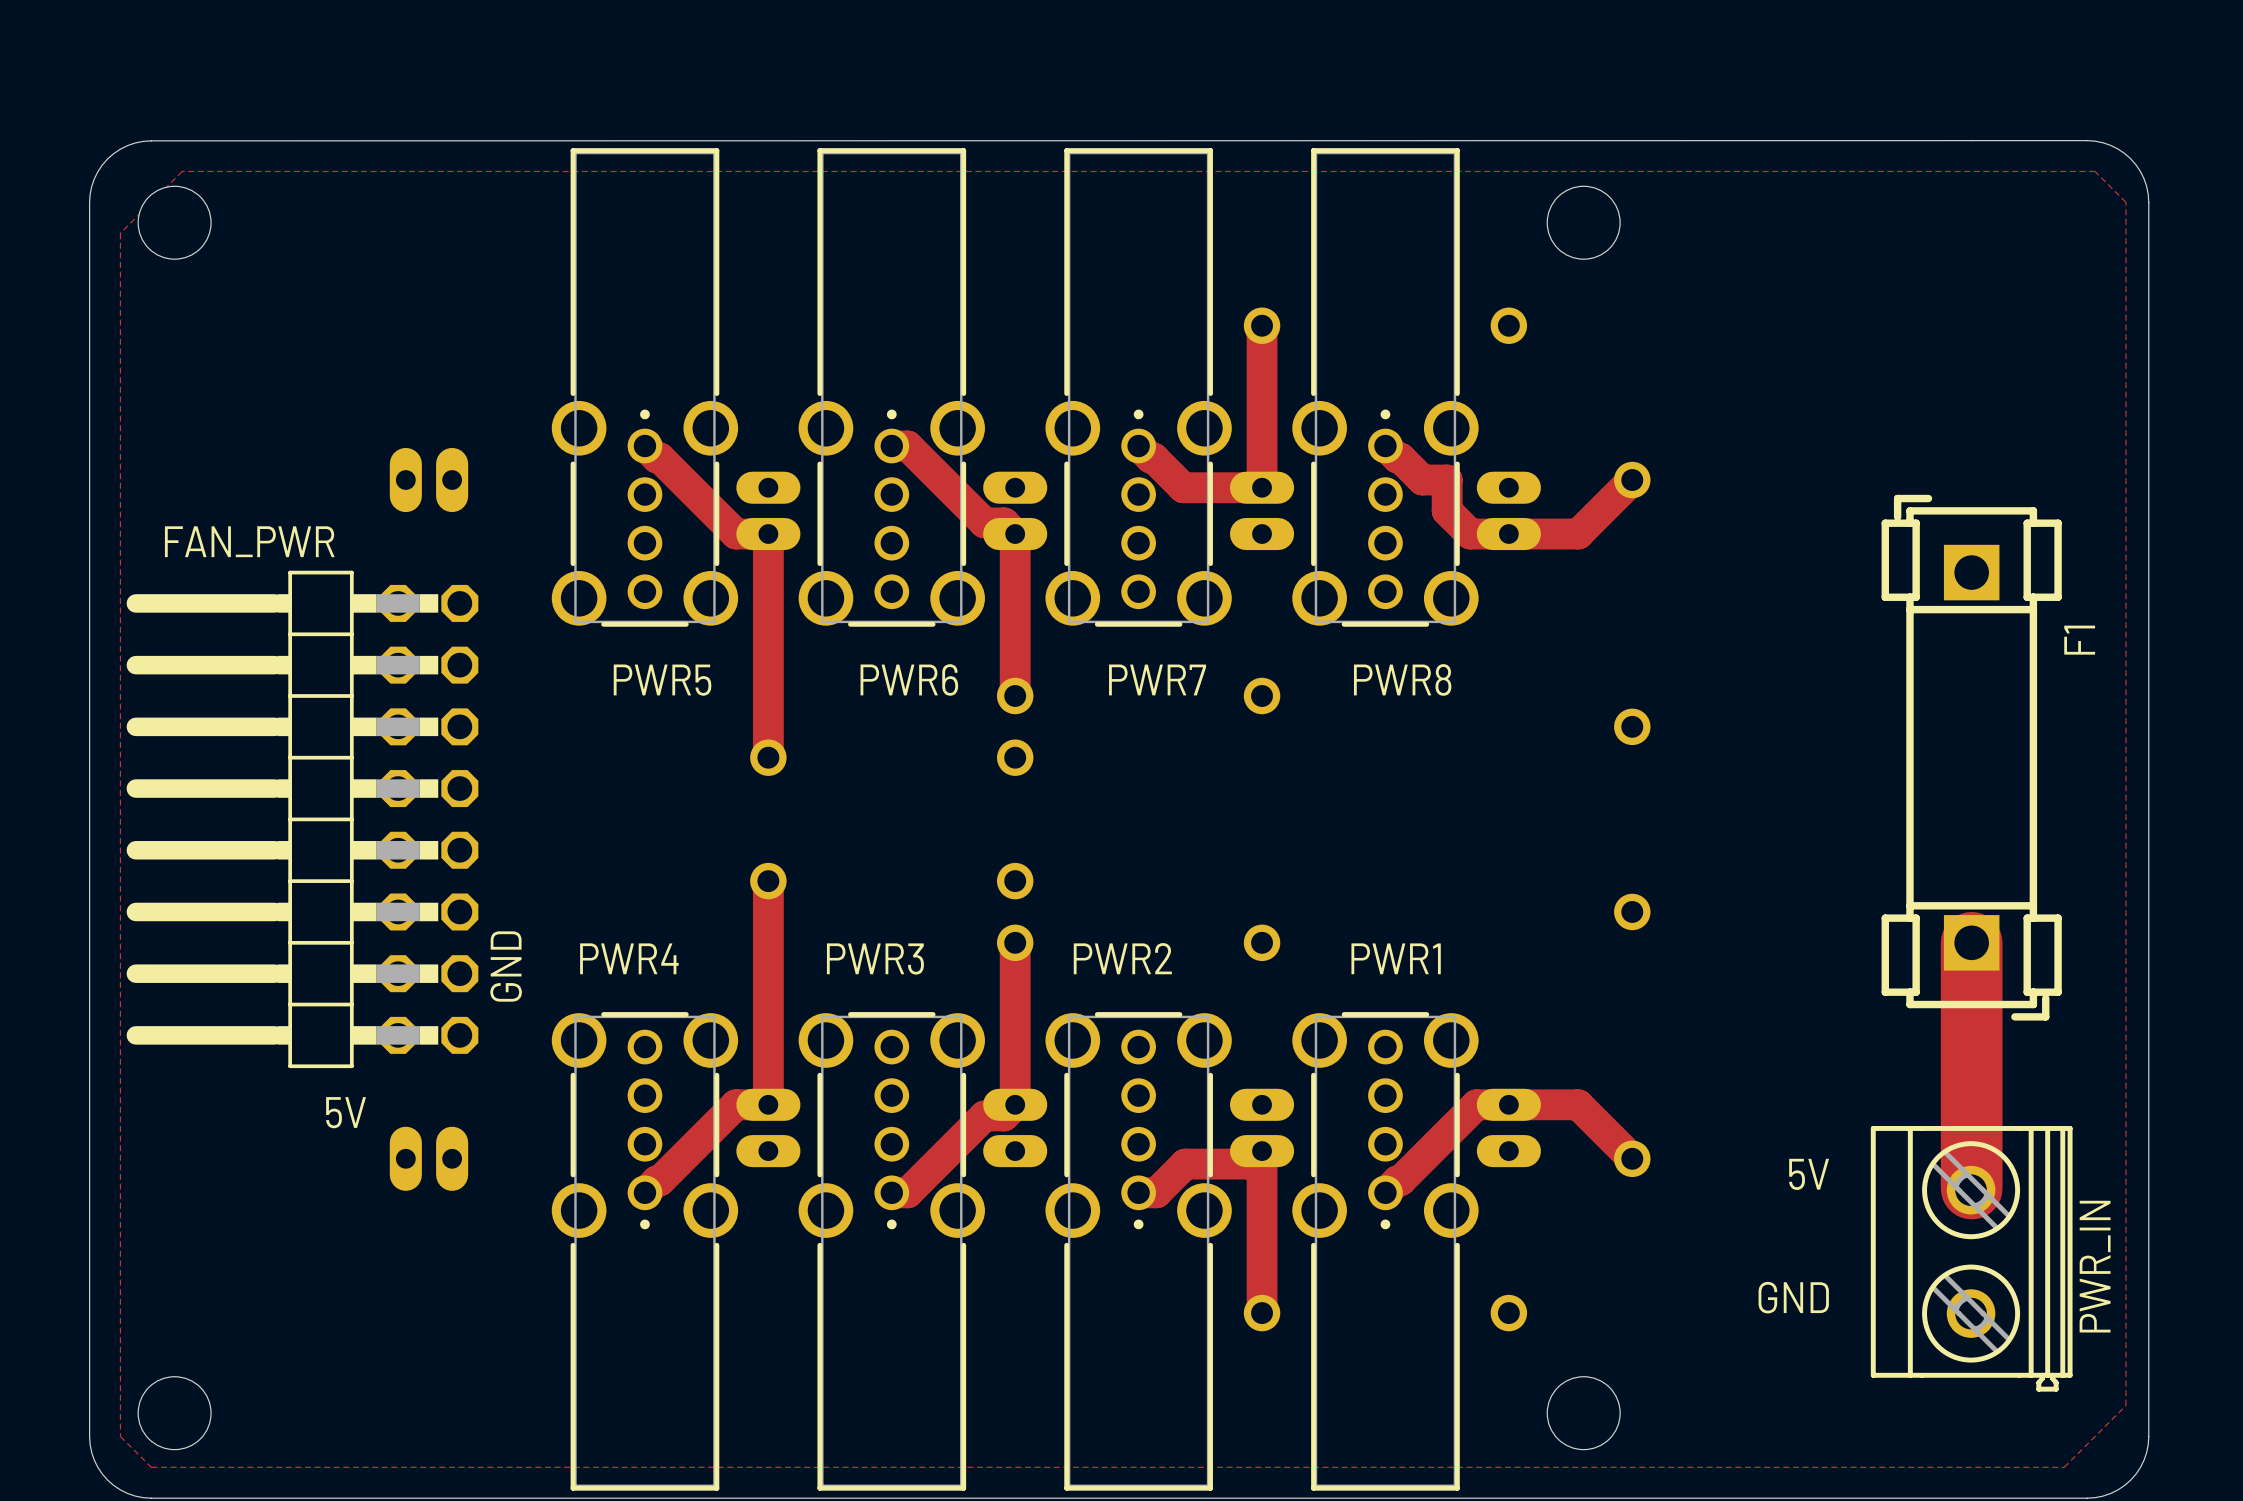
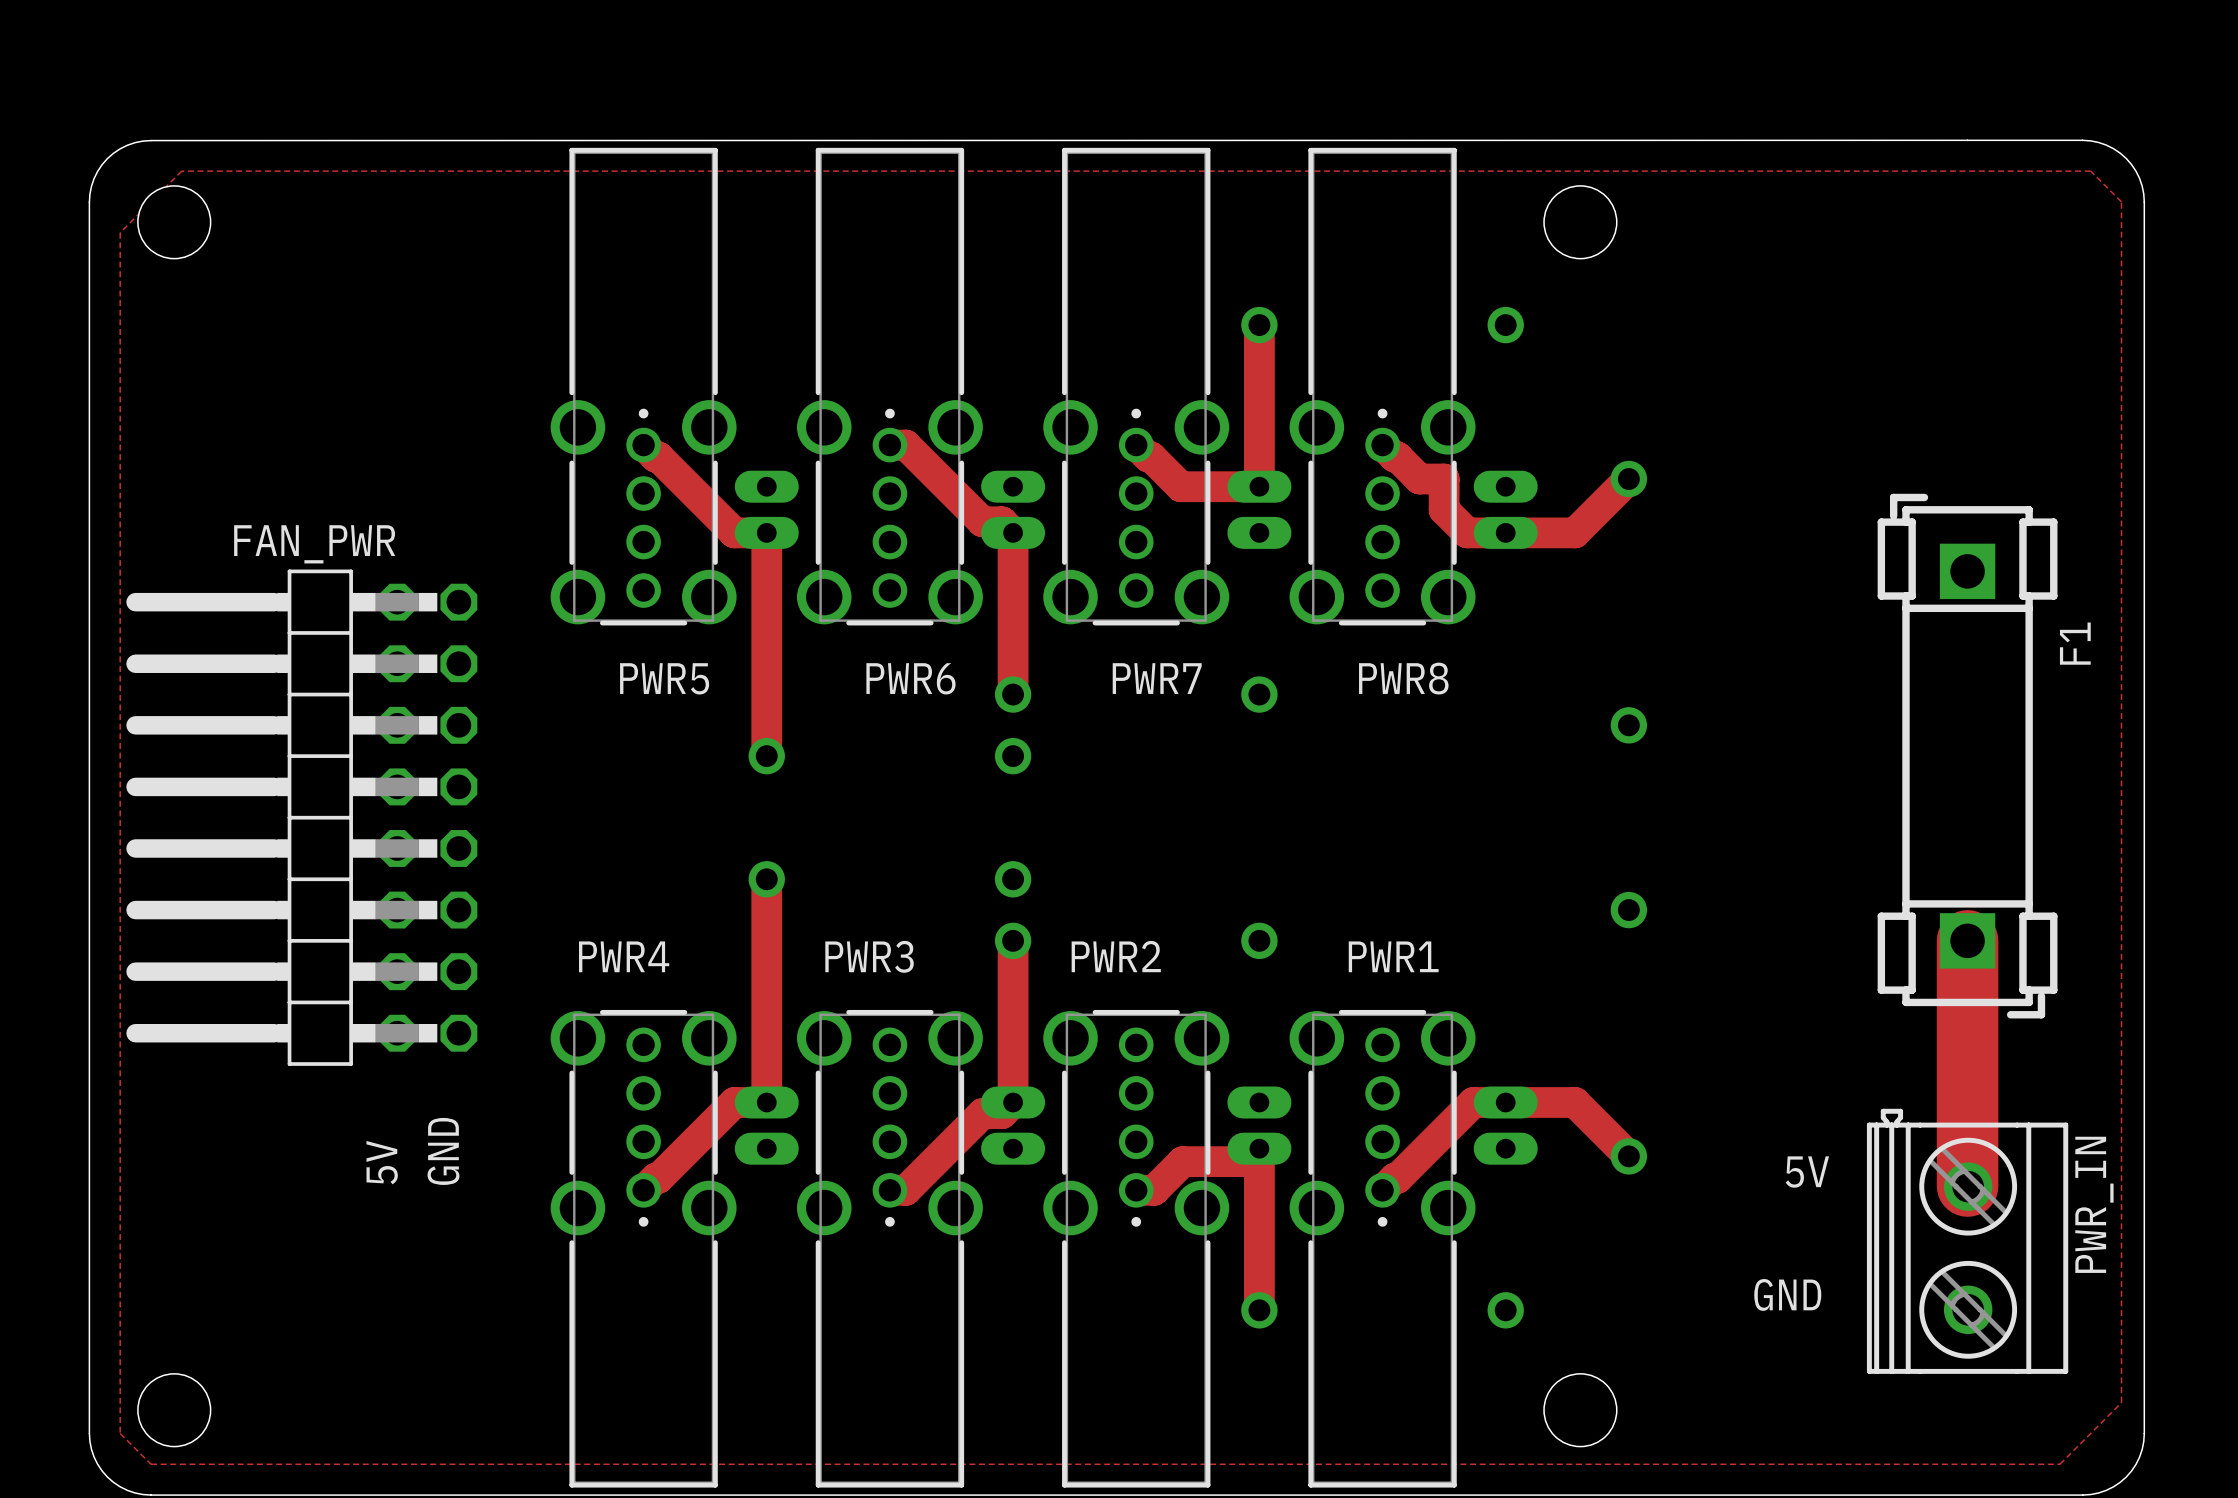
part: (428, 480) -> none
FAN_PWR name position: FAN_PWR (249, 541) -> FAN_PWR (314, 544)
text position: GND (506, 966) -> GND (443, 1151)
text rotation: 0° (346, 1112) -> 90° counterclockwise (382, 1162)
part: (428, 1158) -> none
PWR_IN rotation: 0° (1971, 1258) -> 180° (1967, 1241)

